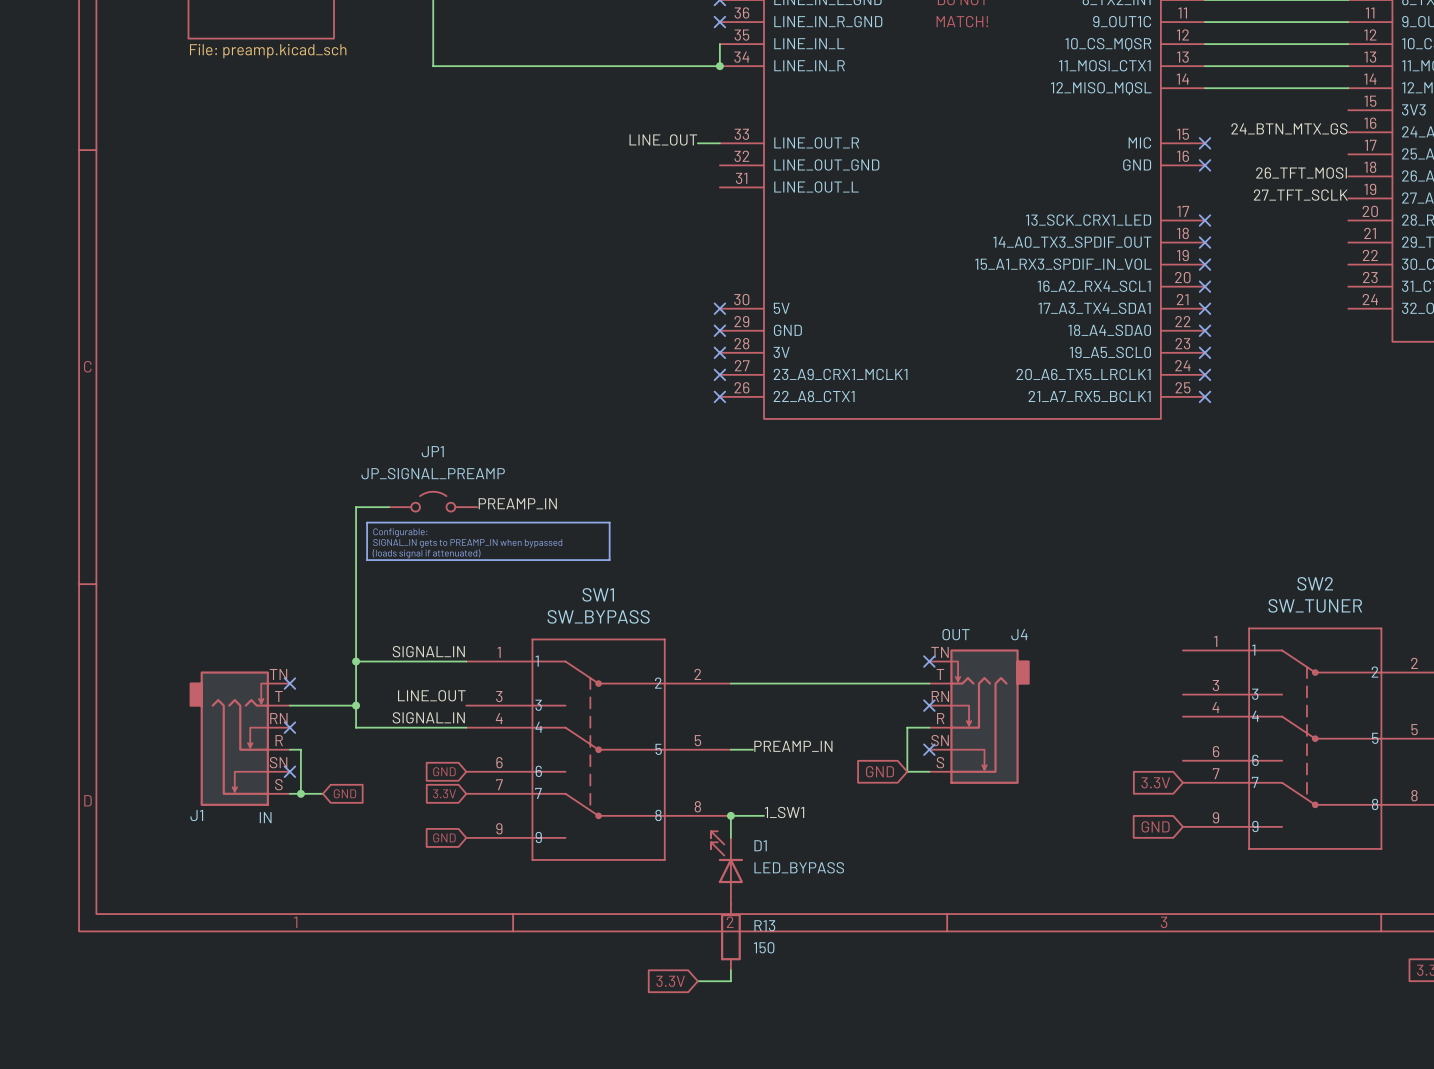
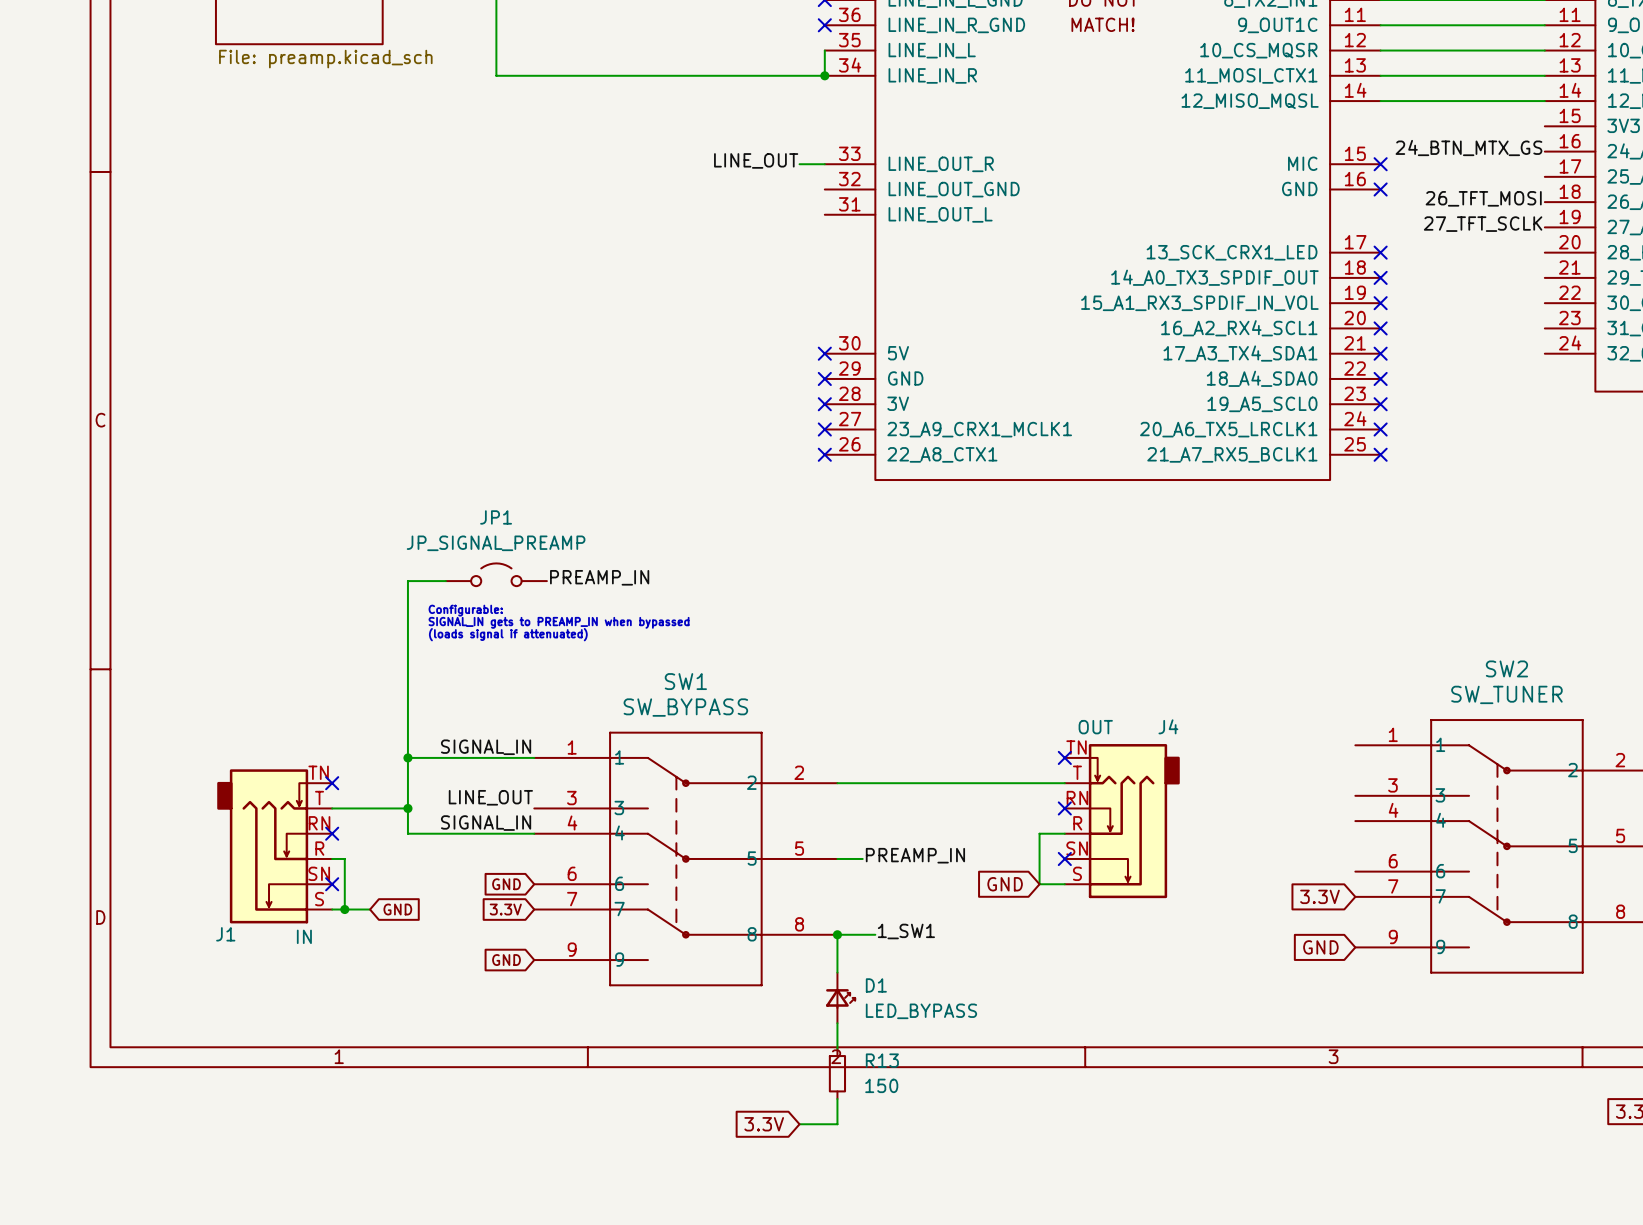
line: (367, 522) (609, 522) (609, 560) (367, 560) (367, 522) -> none
D1 symbol: [711, 831, 744, 905] -> [826, 972, 856, 1024]
R13 symbol: [720, 904, 741, 971] -> [828, 1048, 847, 1099]

